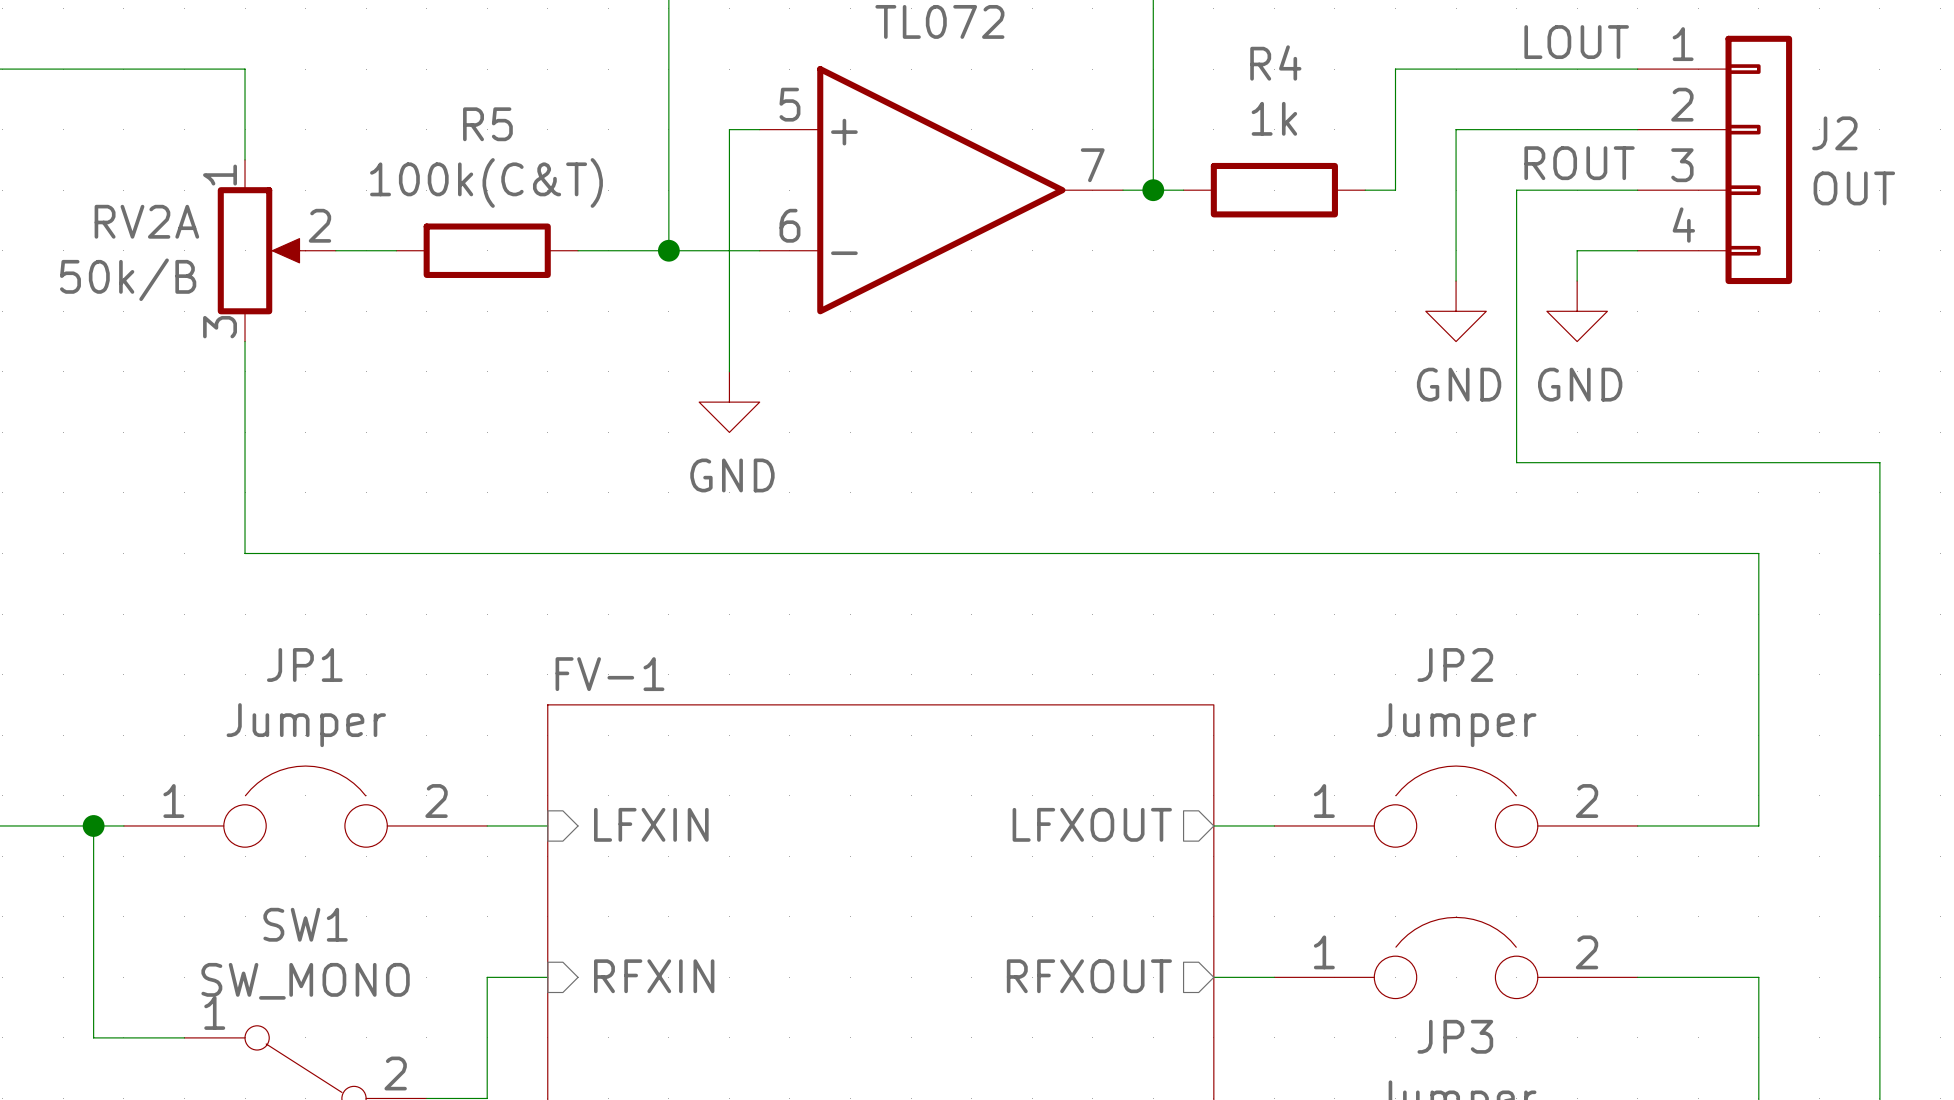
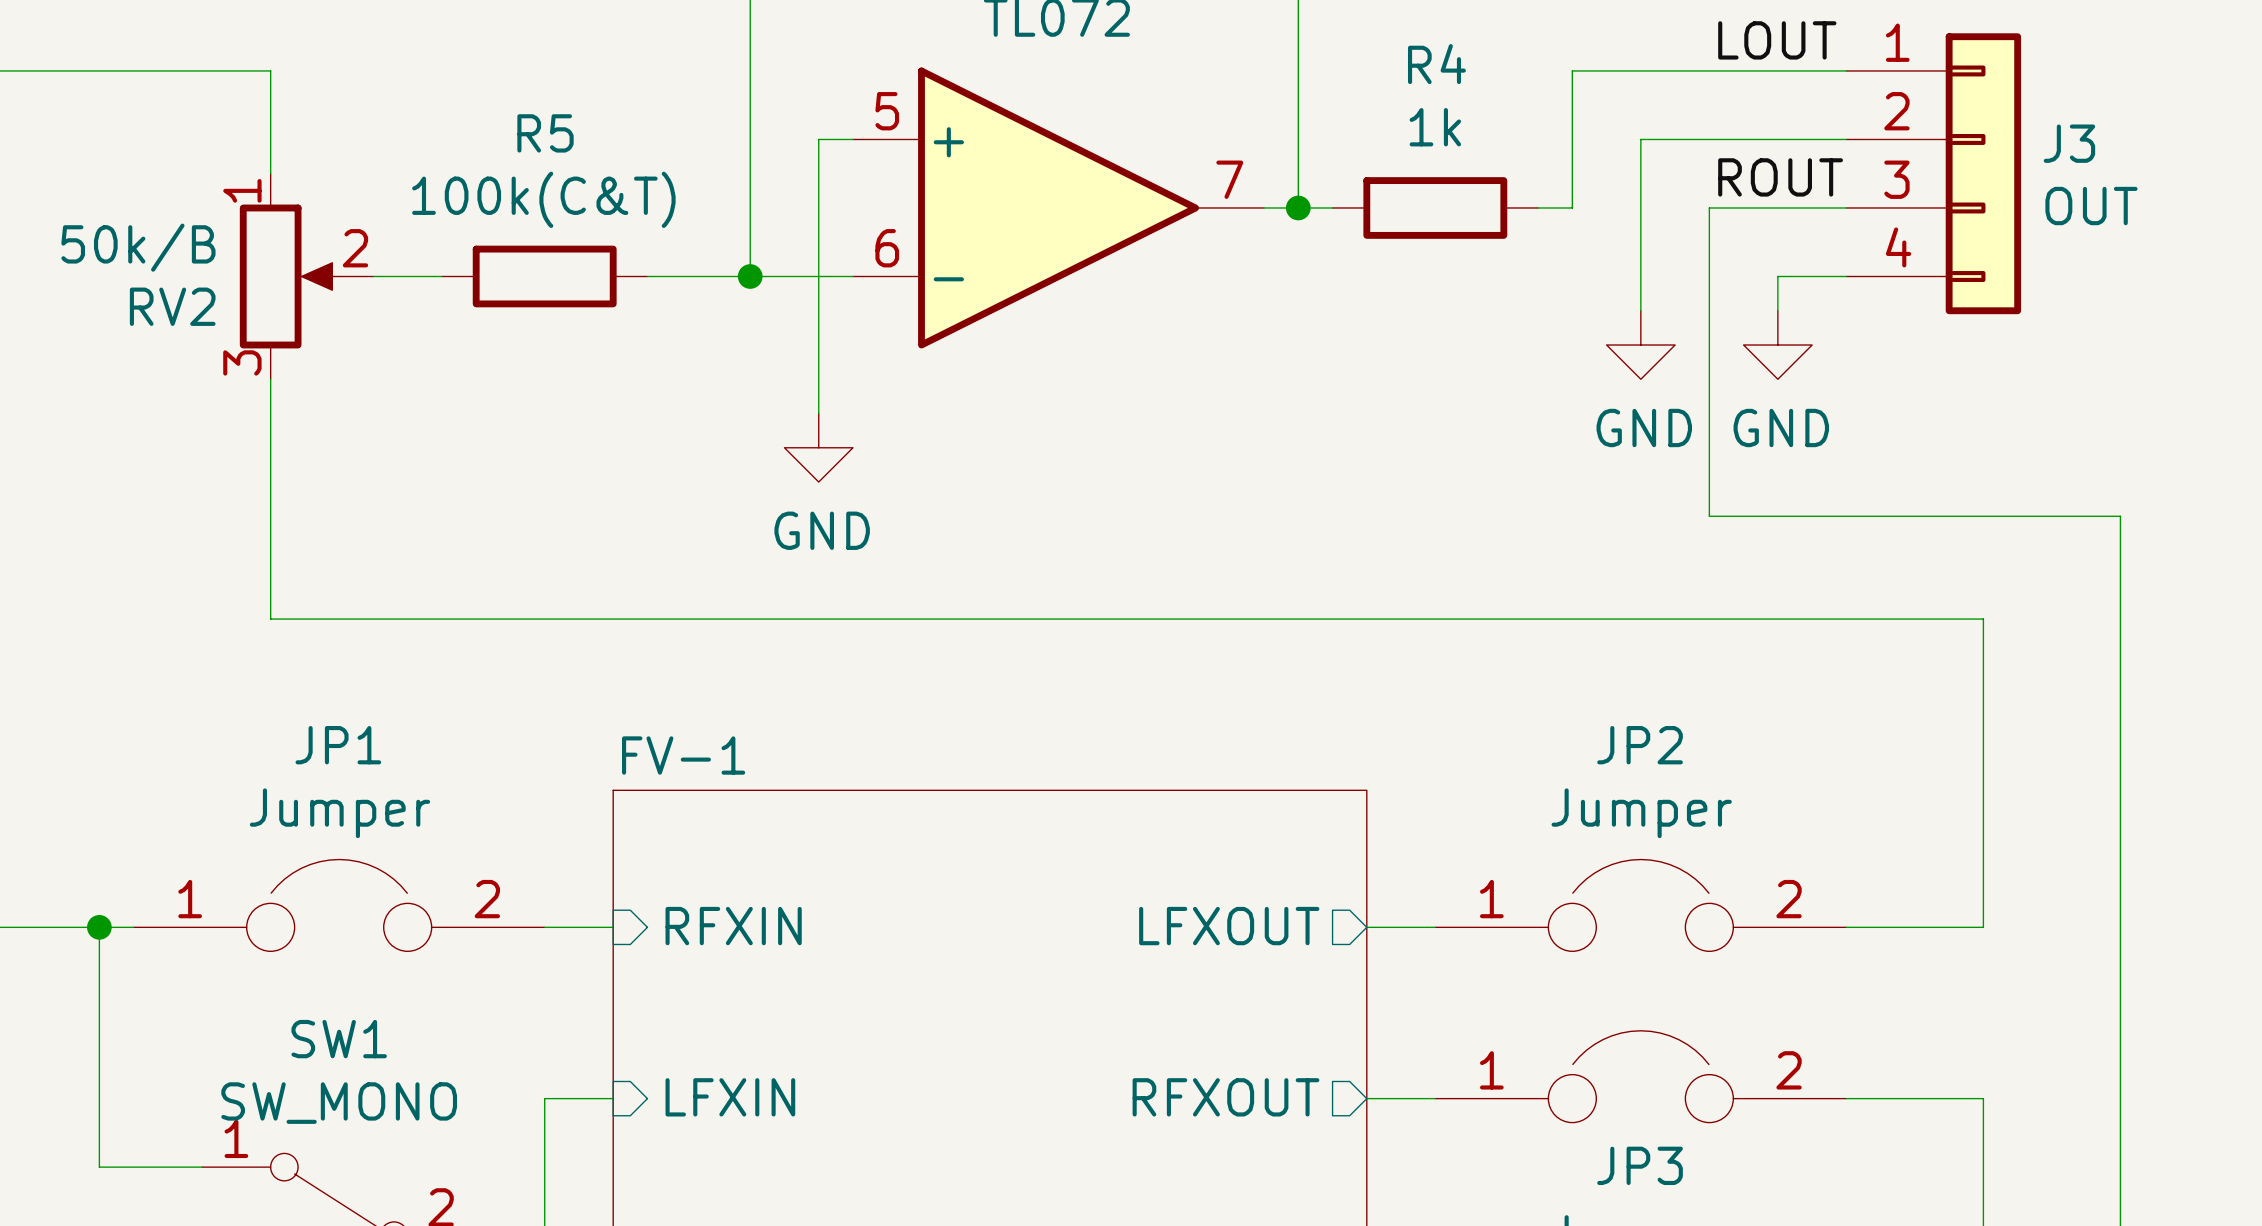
J2 name: J2 (1834, 133) -> J3 (2069, 143)
RV2A name: RV2A (146, 221) -> RV2 (172, 306)
RV2A value position: 50k/B (128, 279) -> 50k/B (138, 247)
sheet pin: LFXIN (651, 824) -> RFXIN (733, 926)
sheet pin: RFXIN (654, 976) -> LFXIN (730, 1097)

